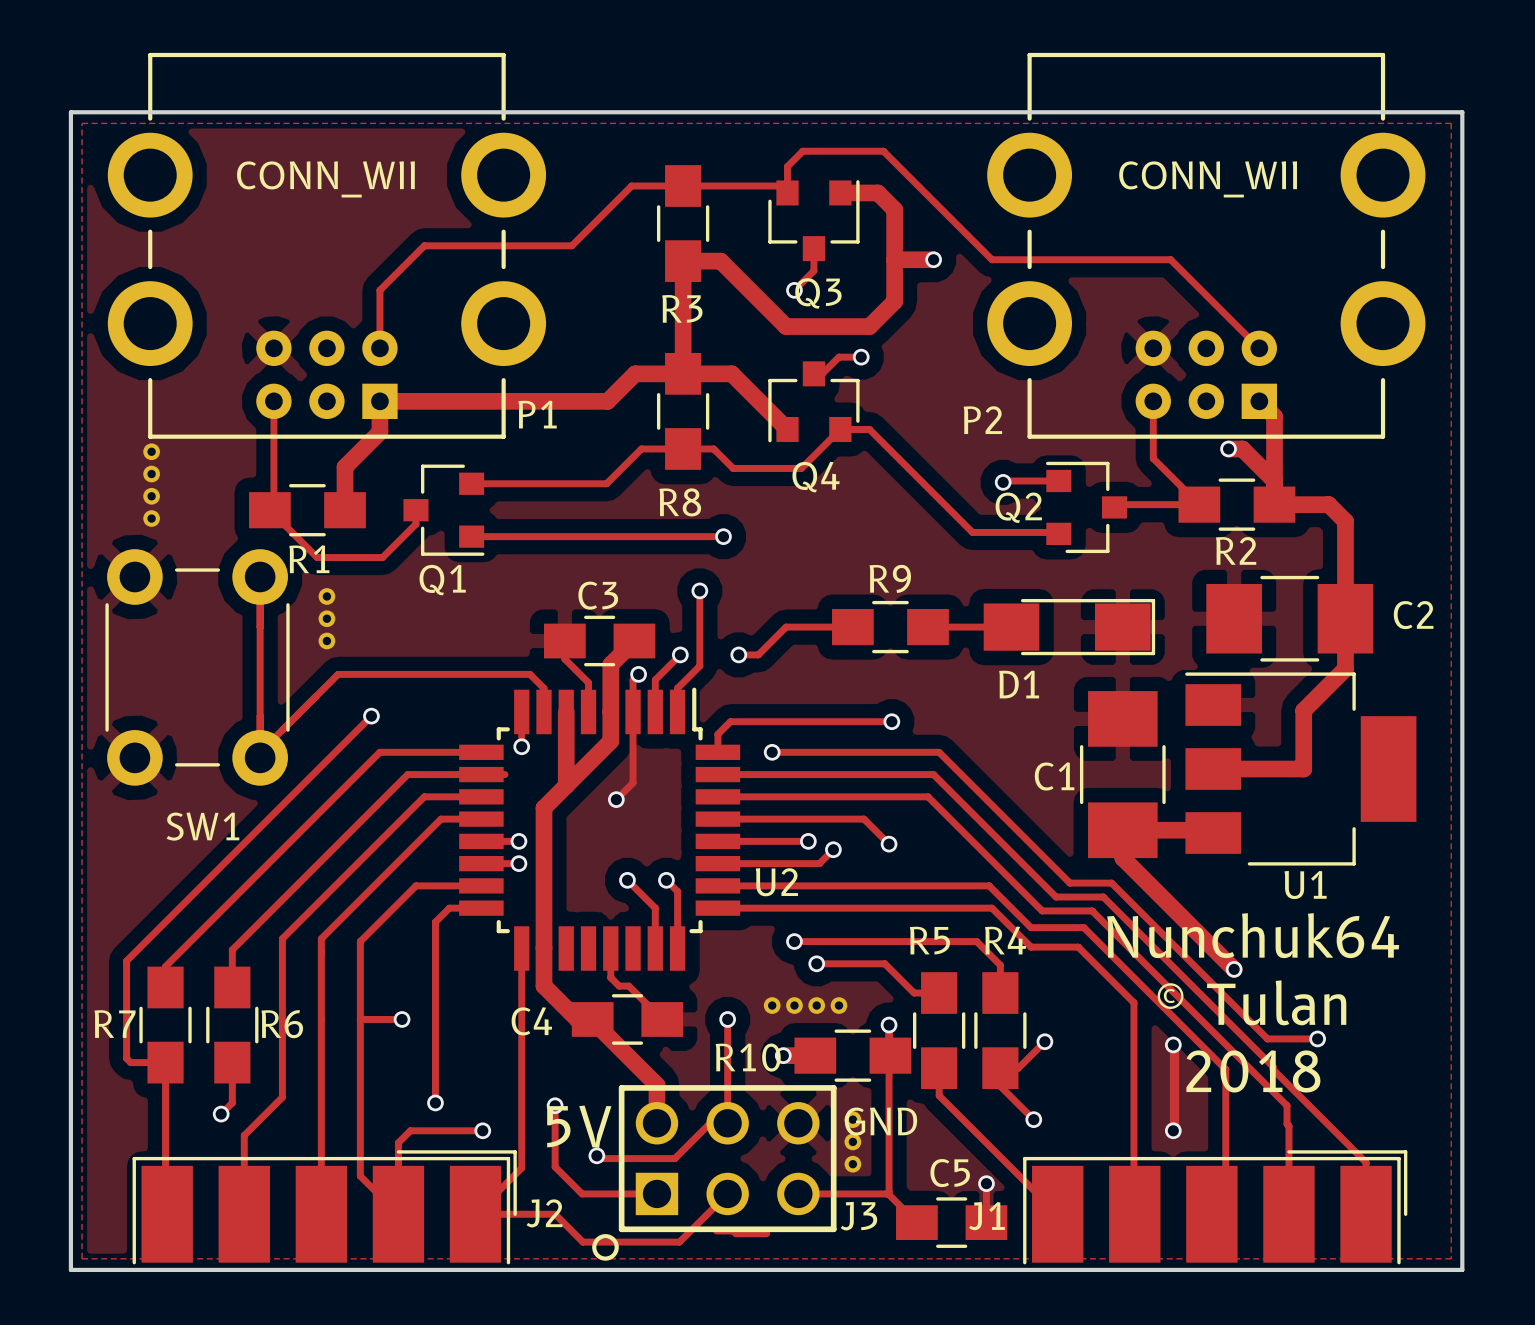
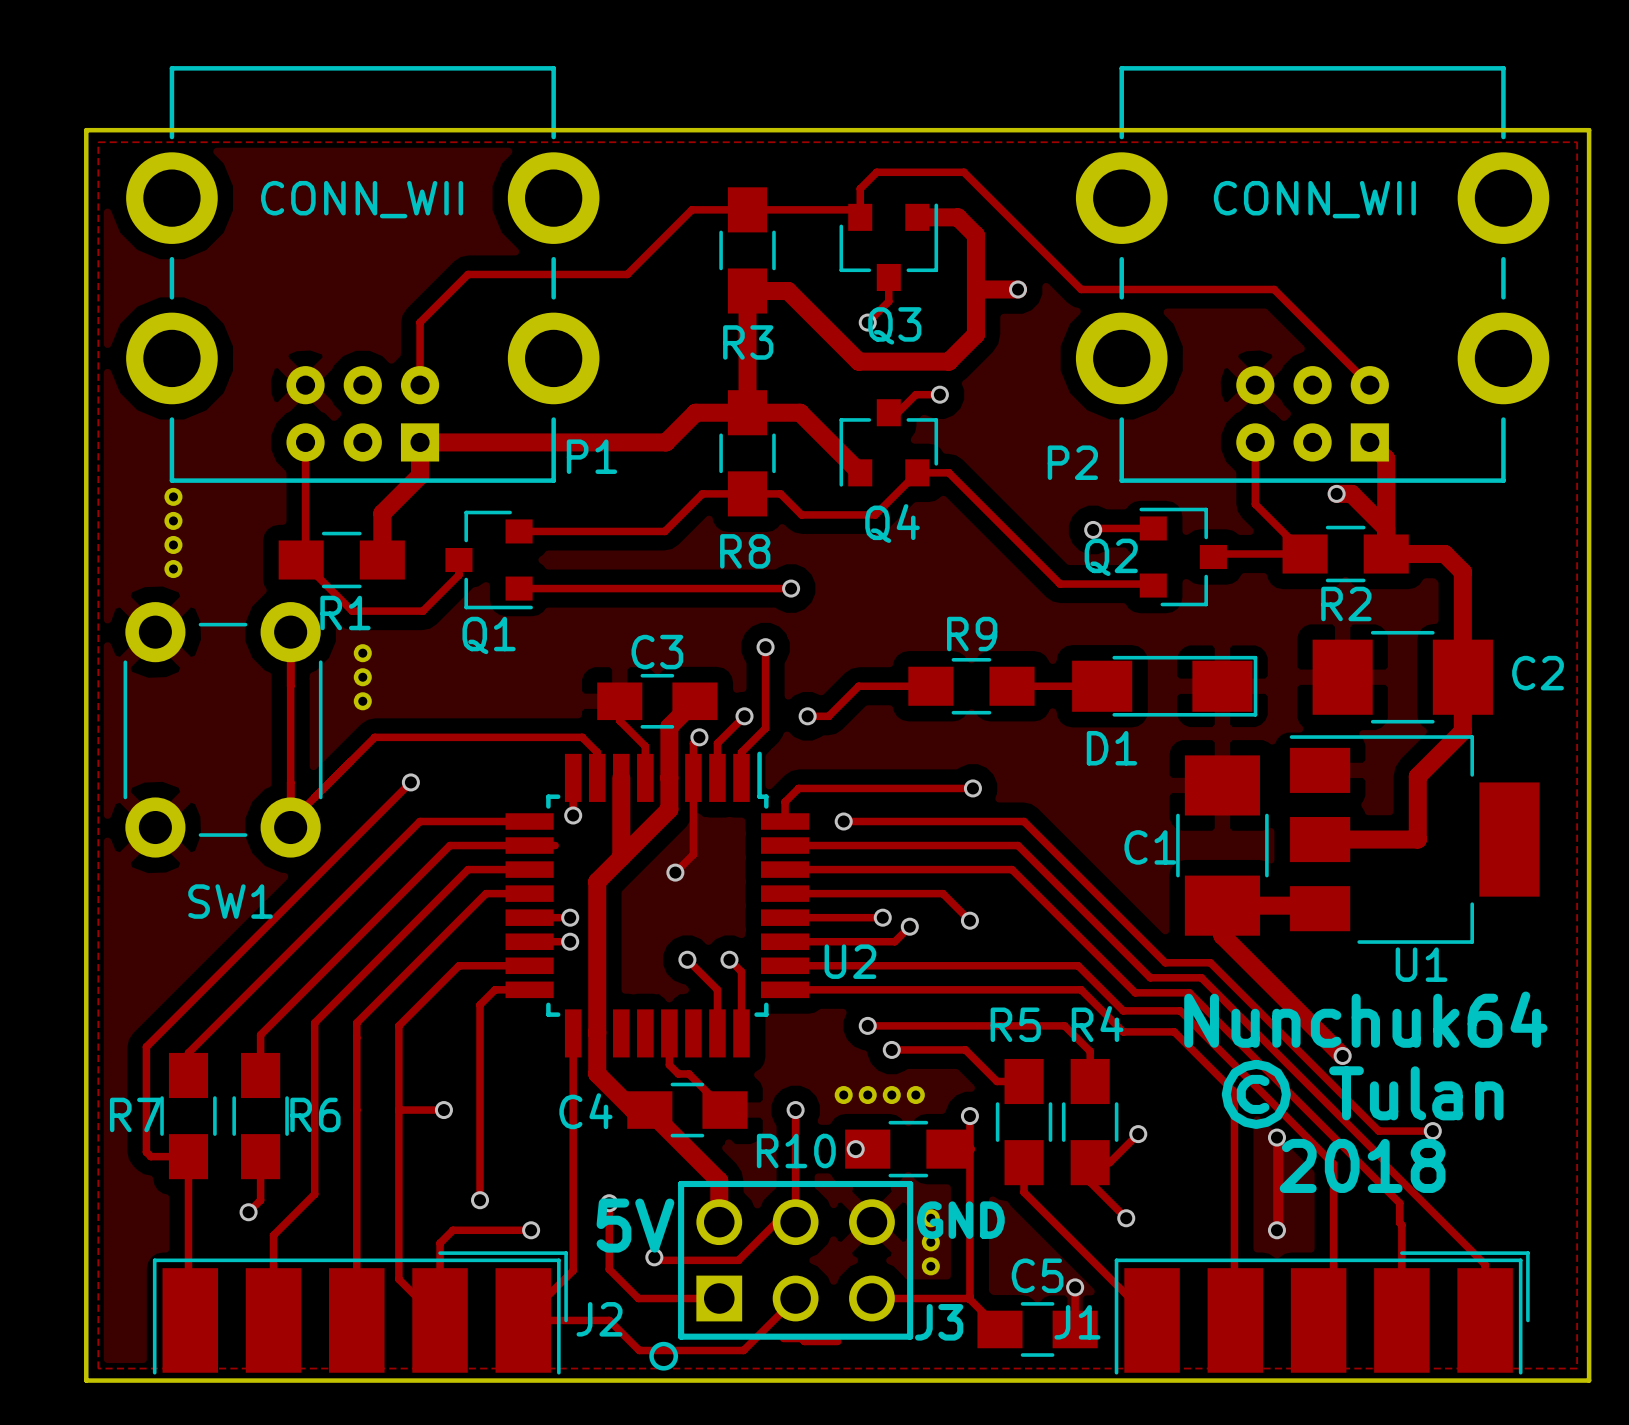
R10 position: (852, 1055) -> (908, 1149)

